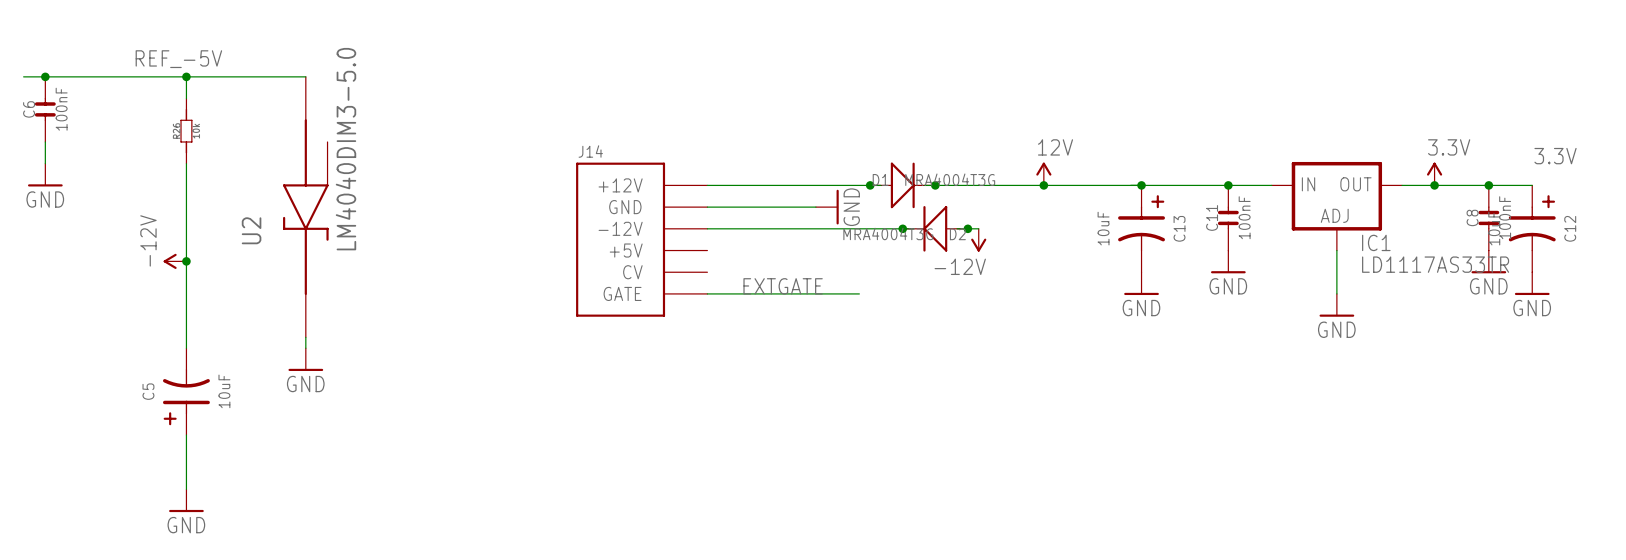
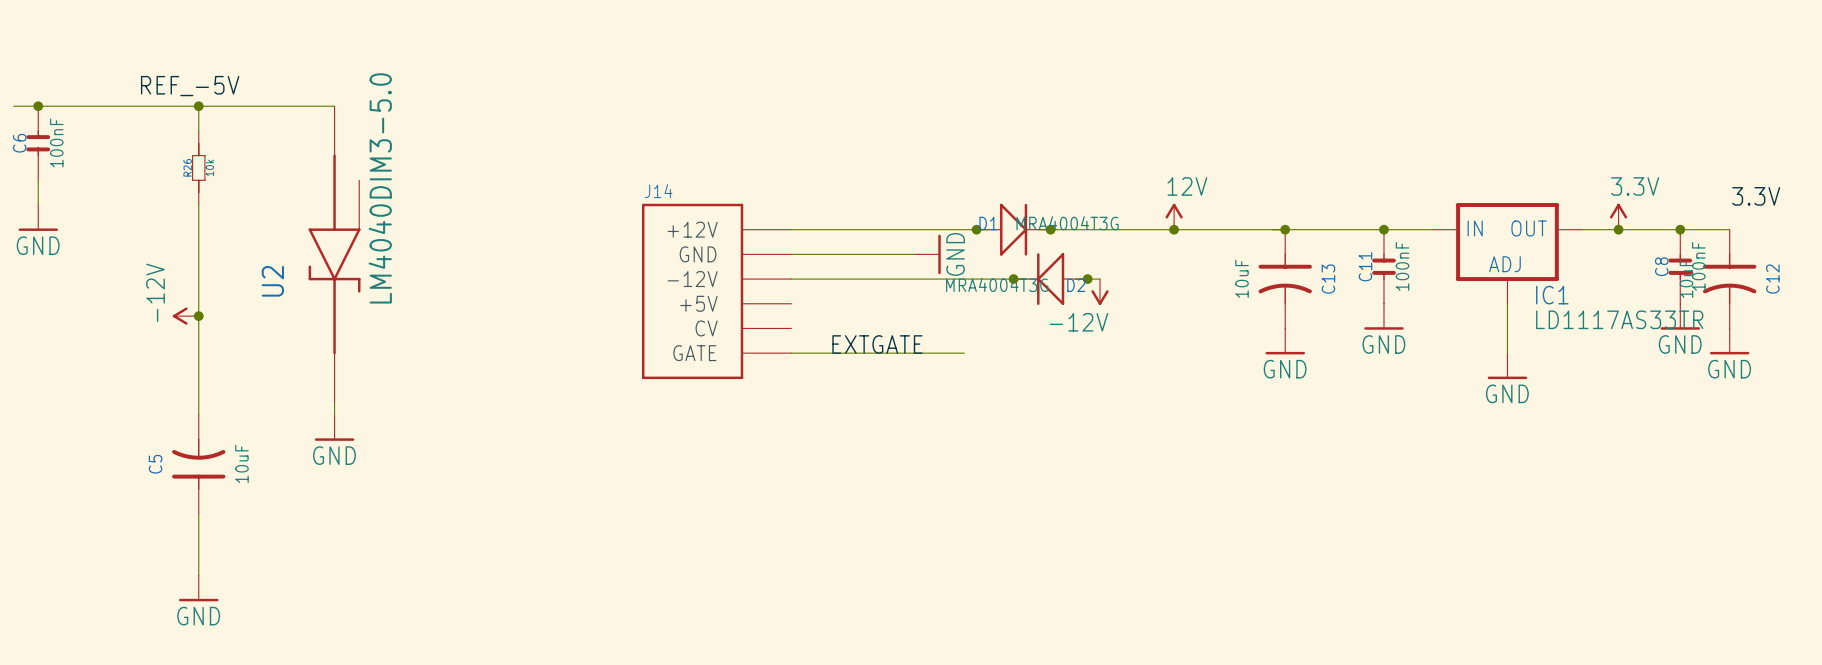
C13 symbol: [1118, 185, 1165, 273] -> [1258, 229, 1312, 329]
C12 symbol: [1508, 185, 1556, 273] -> [1703, 229, 1757, 329]
C5 symbol: [162, 348, 210, 436] -> [172, 414, 226, 514]

